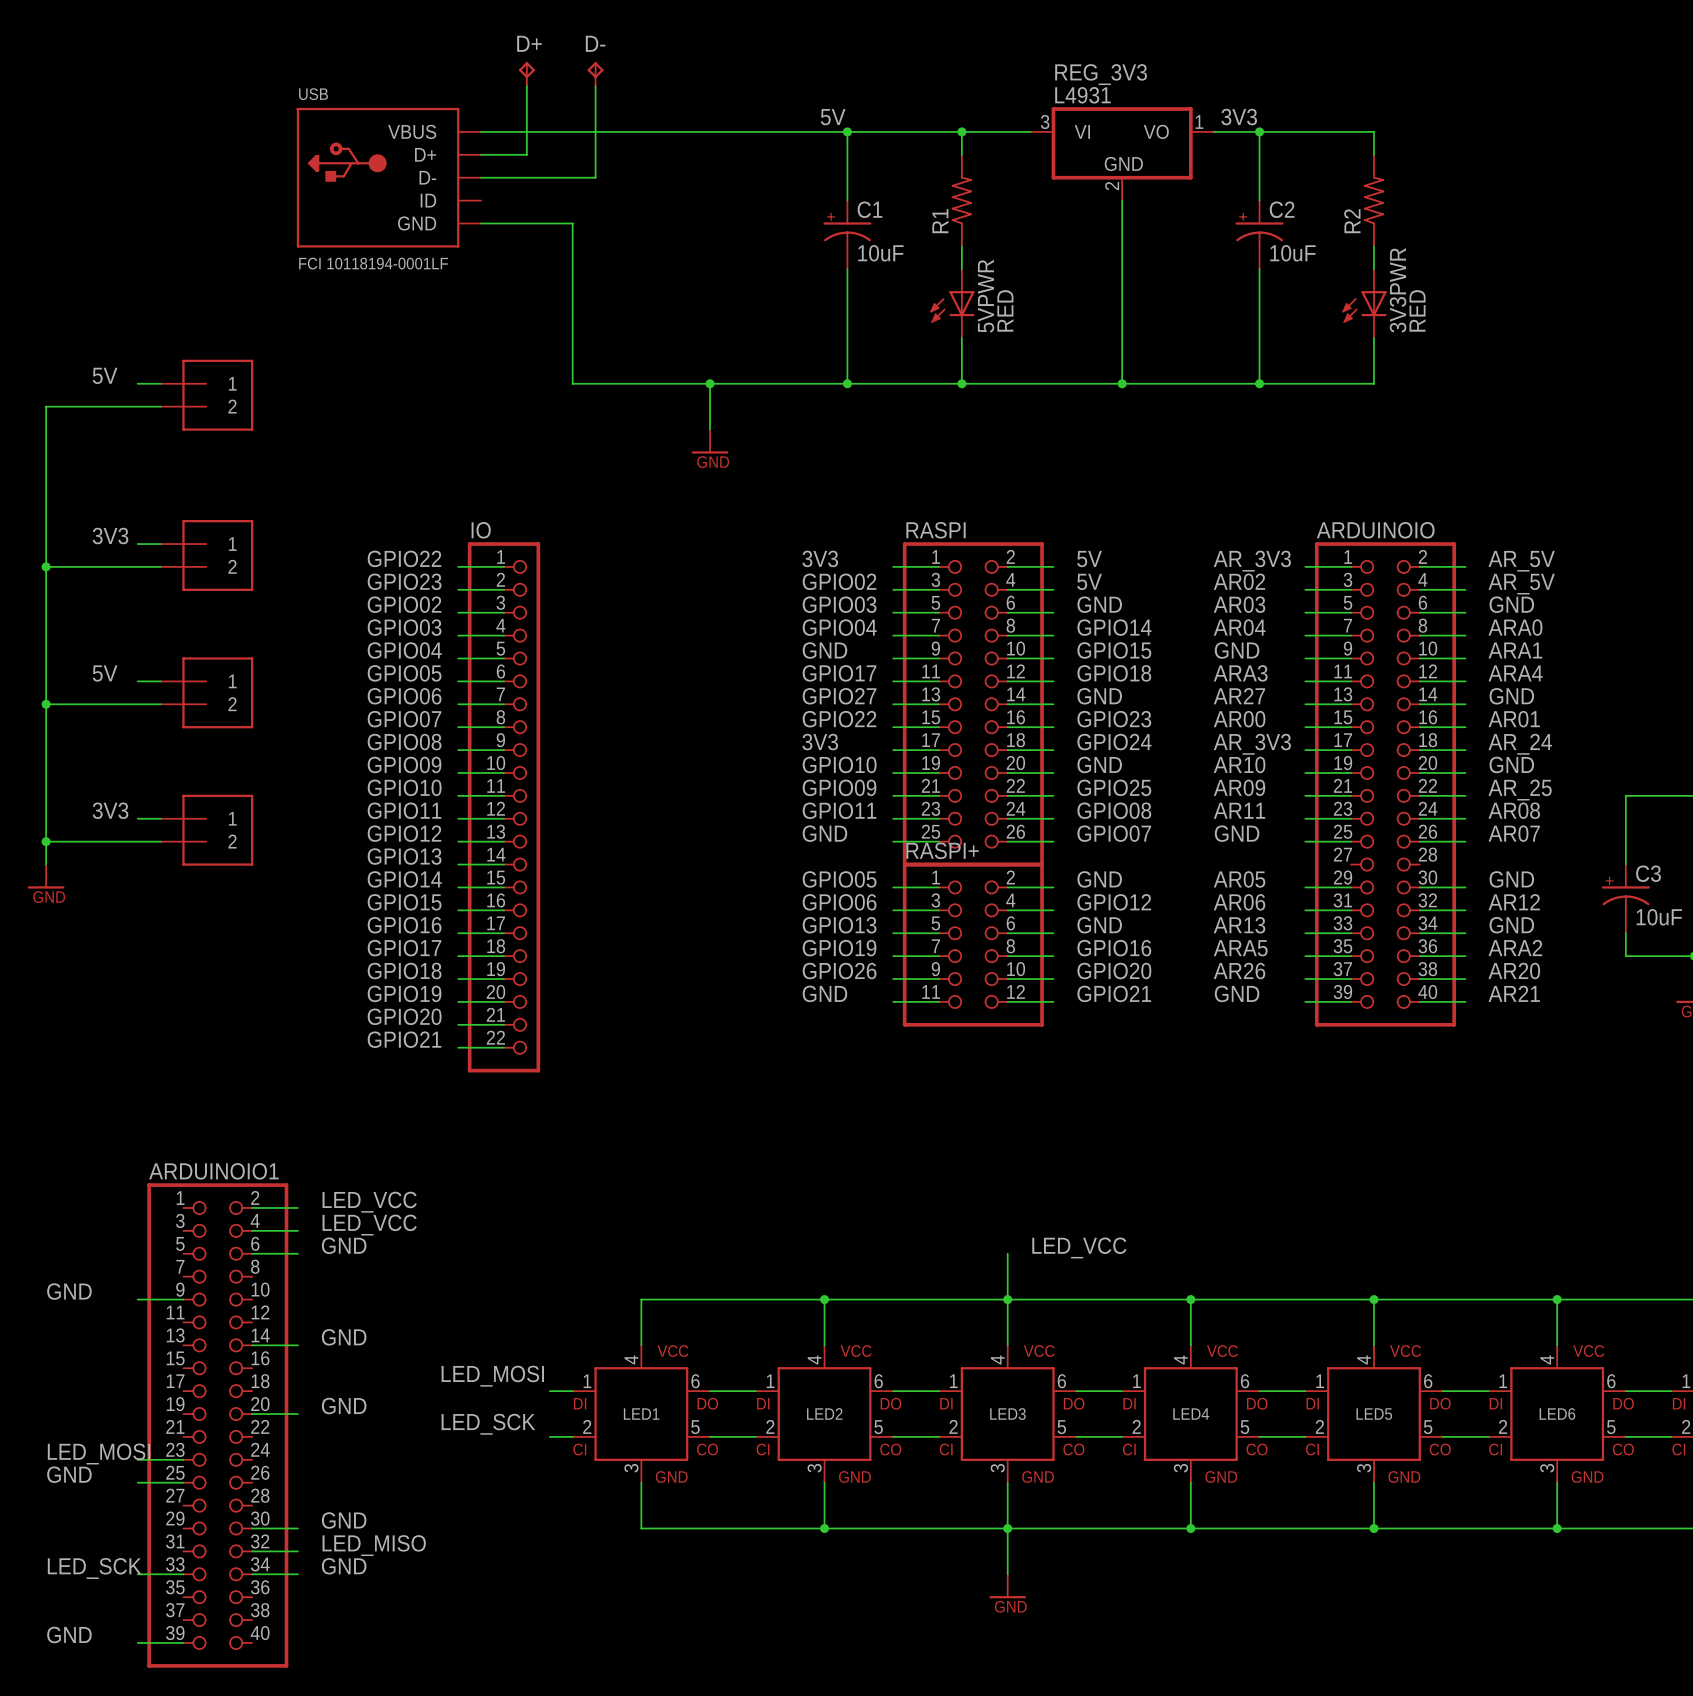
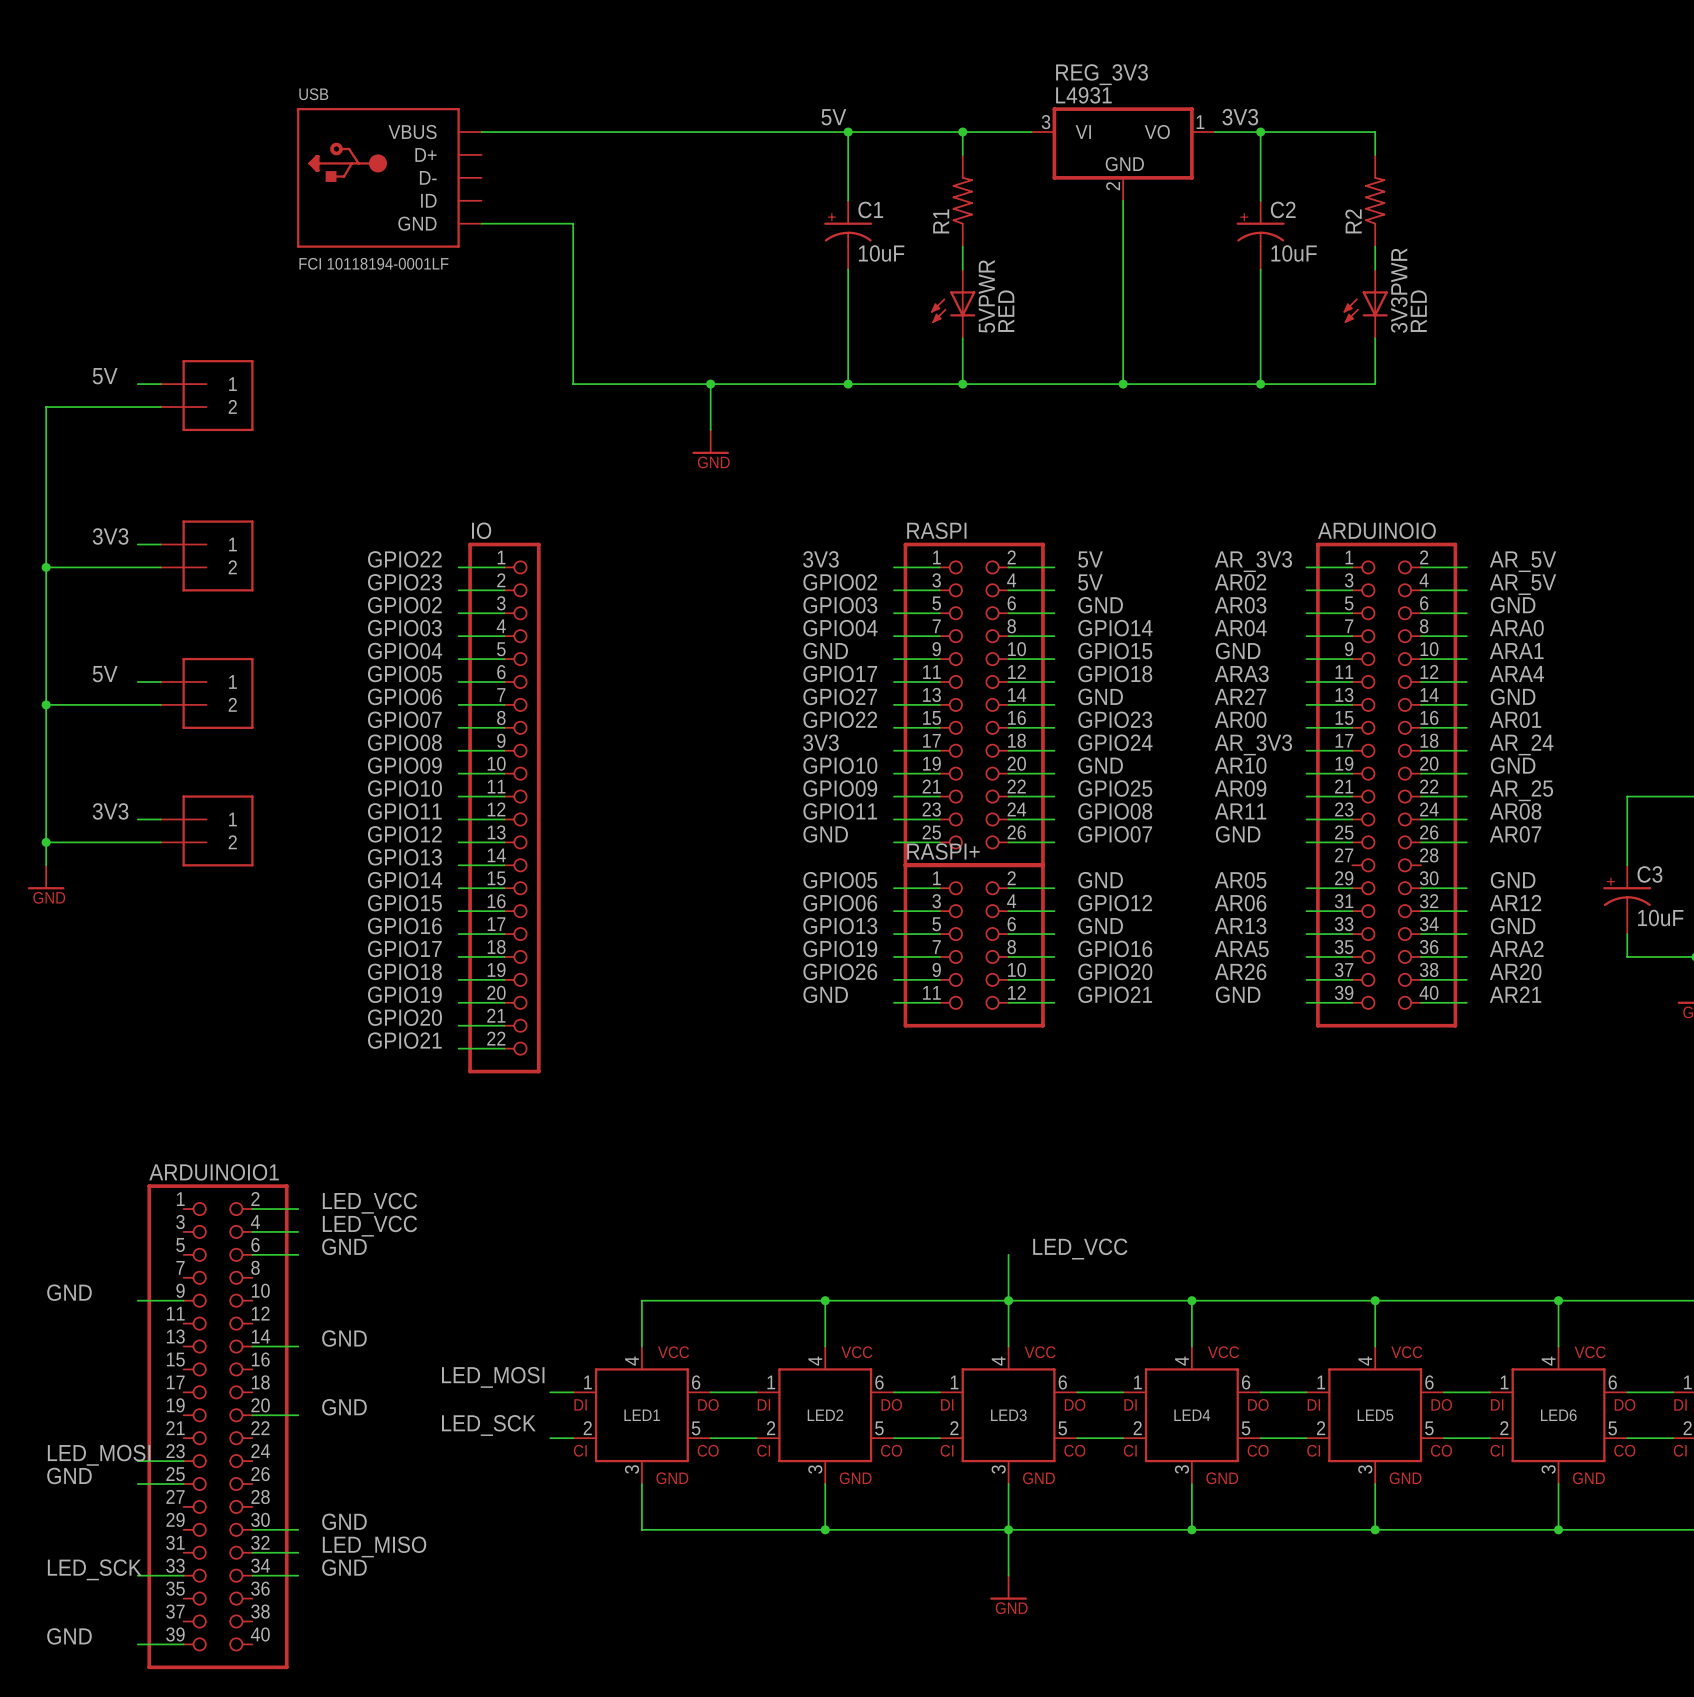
D+: (526, 74) -> none
D-: (595, 74) -> none
wire: (526, 86) (526, 154) (481, 154) -> none
wire: (595, 86) (595, 177) (481, 177) -> none

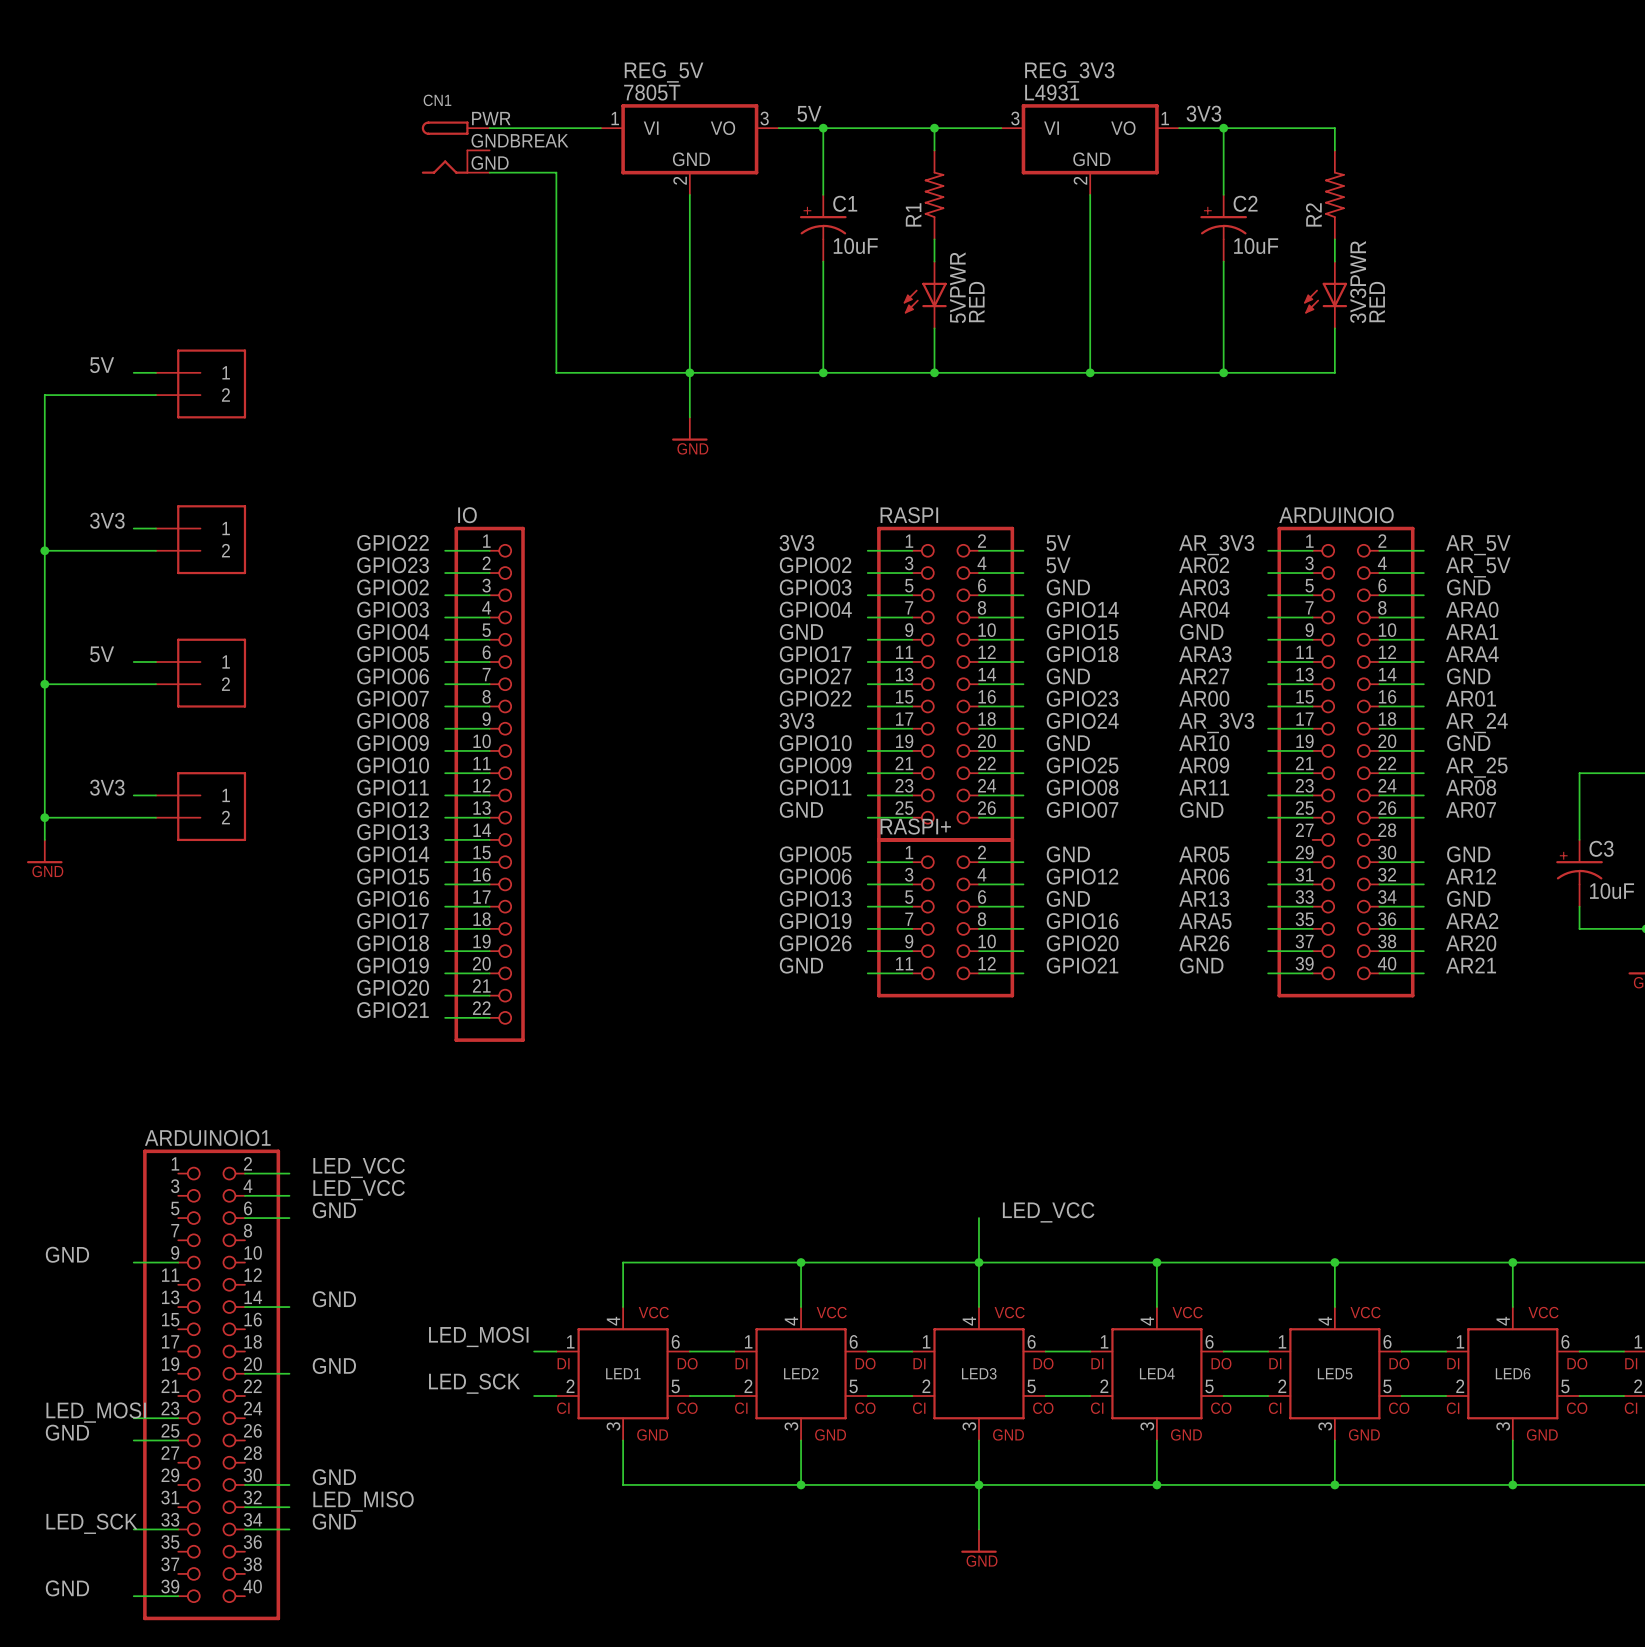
wire: (619, 132) (802, 132) -> none
CN1: none -> (455, 147)
REG_5V: none -> 7805T (689, 149)
USB: FCI 10118194-0001LF (389, 177) -> none
wire: none -> (689, 194) (689, 372)
wire: (481, 223) (573, 223) -> (489, 172) (556, 172) (556, 217)

